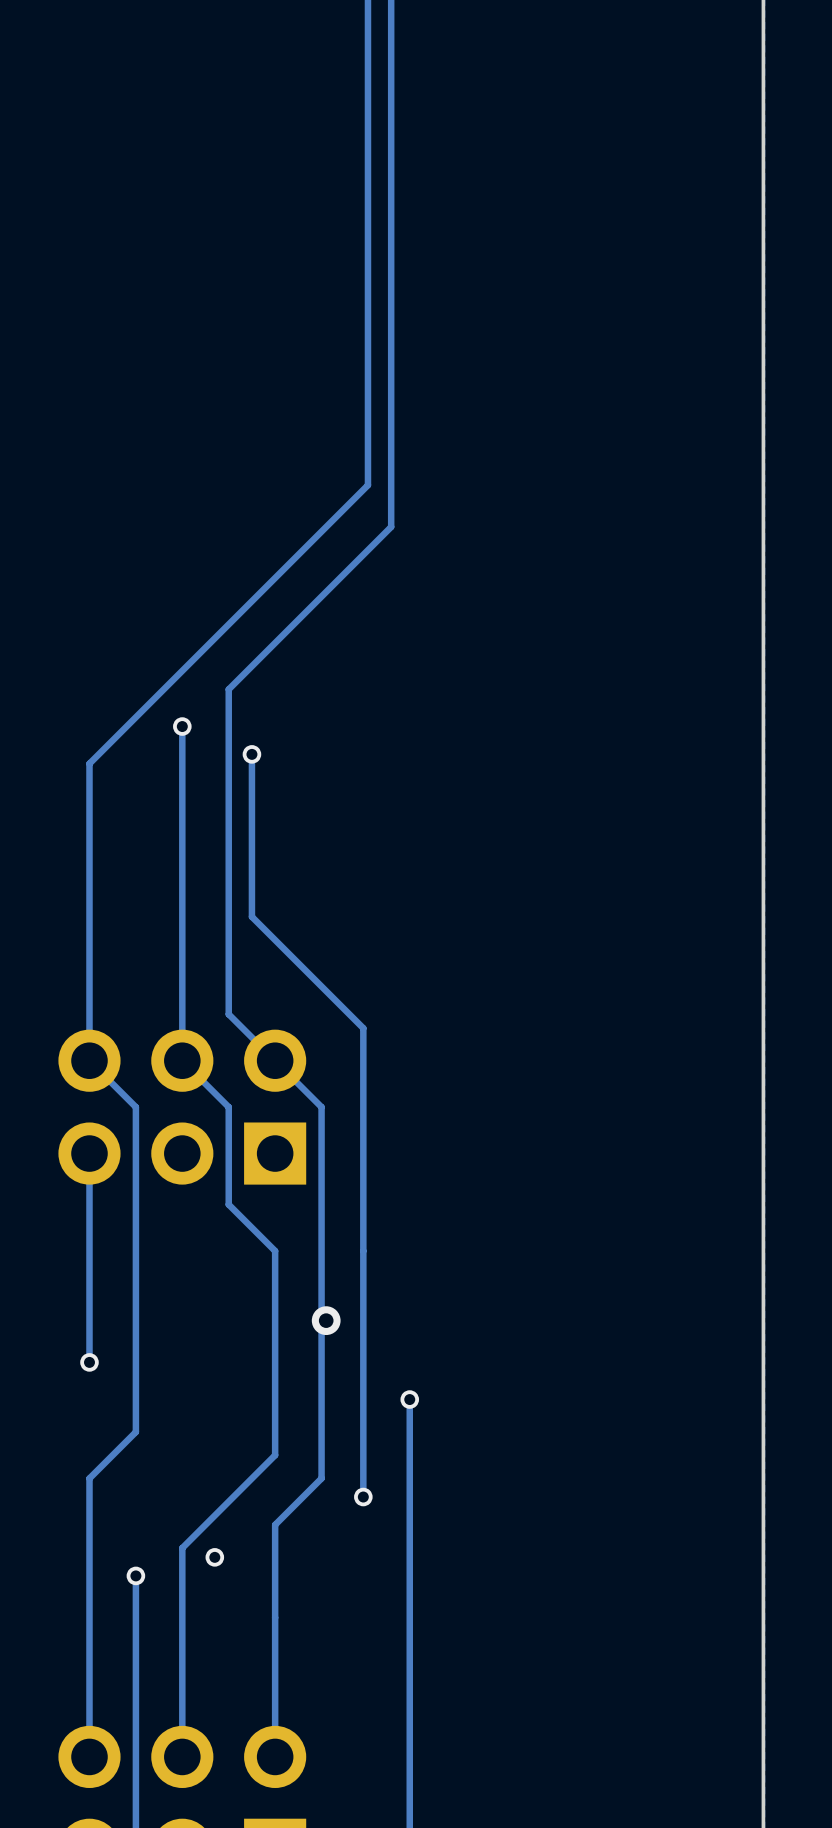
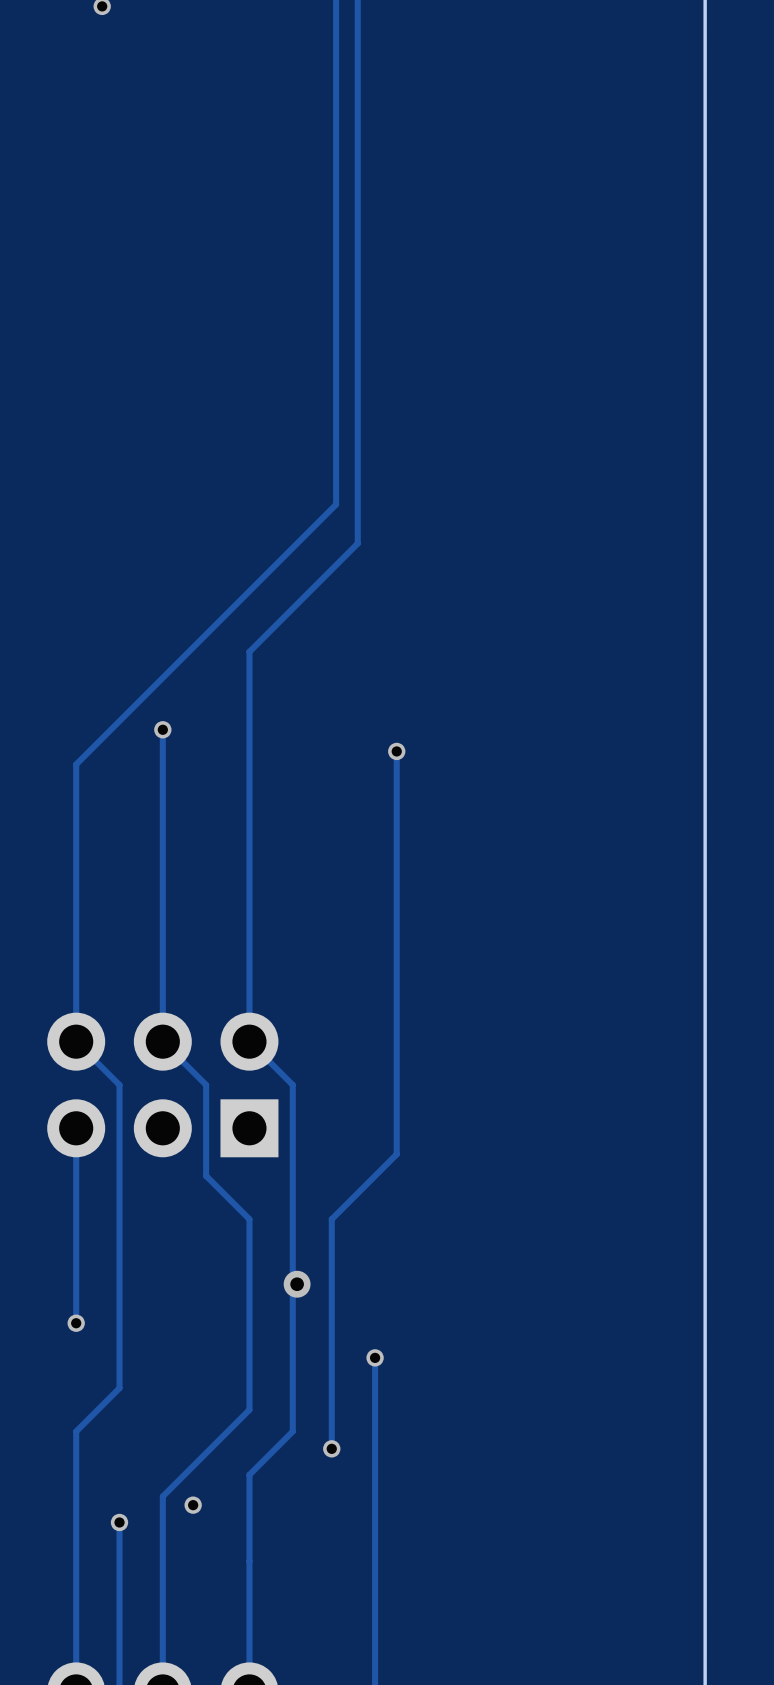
track: (275, 642) (228, 689) (228, 1014) (275, 1060) -> (249, 651) (249, 1041)
track: (251, 749) (251, 916) (363, 1028) (363, 1251) -> (396, 751) (396, 1154) (331, 1219)
via position: (251, 754) -> (396, 751)

